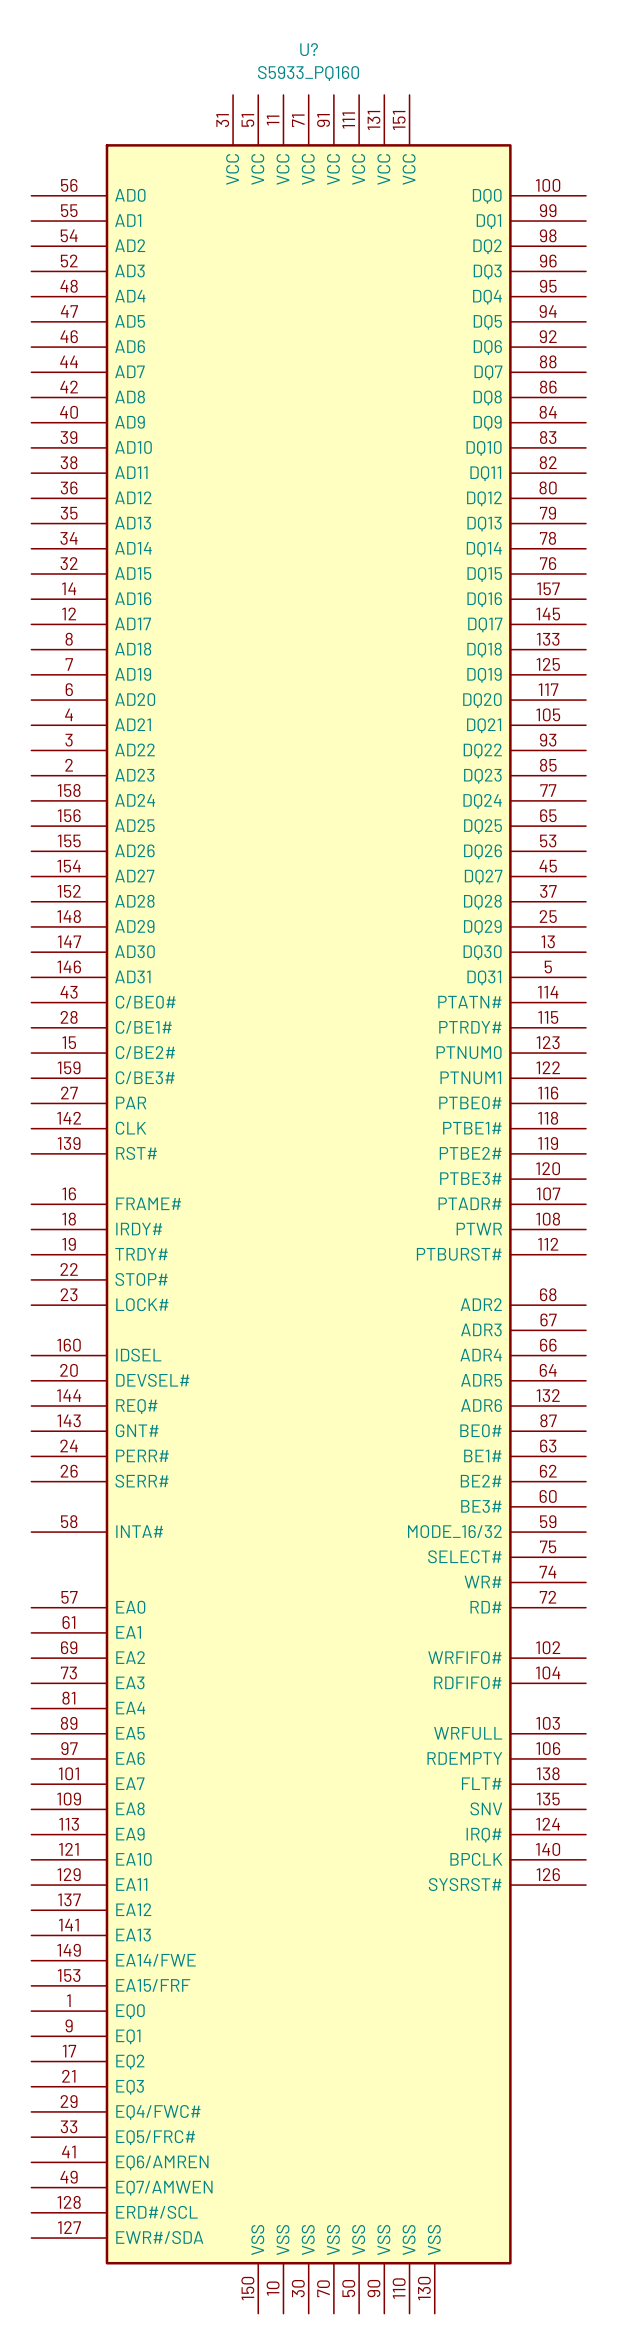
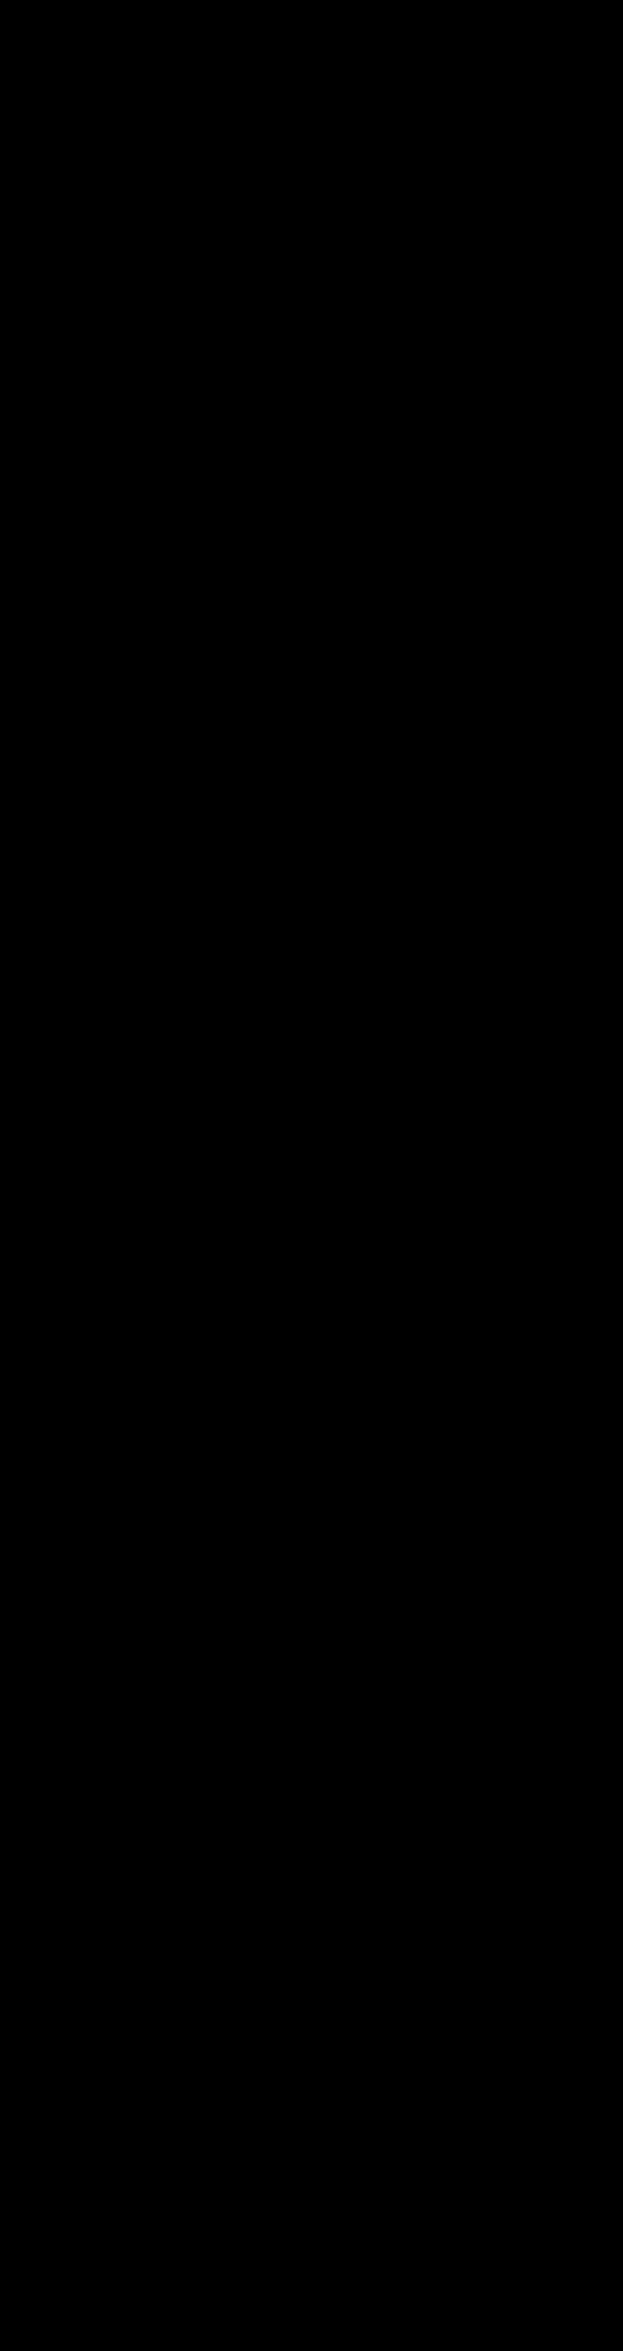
U?: S5933_PQ160 (308, 1204) -> none

